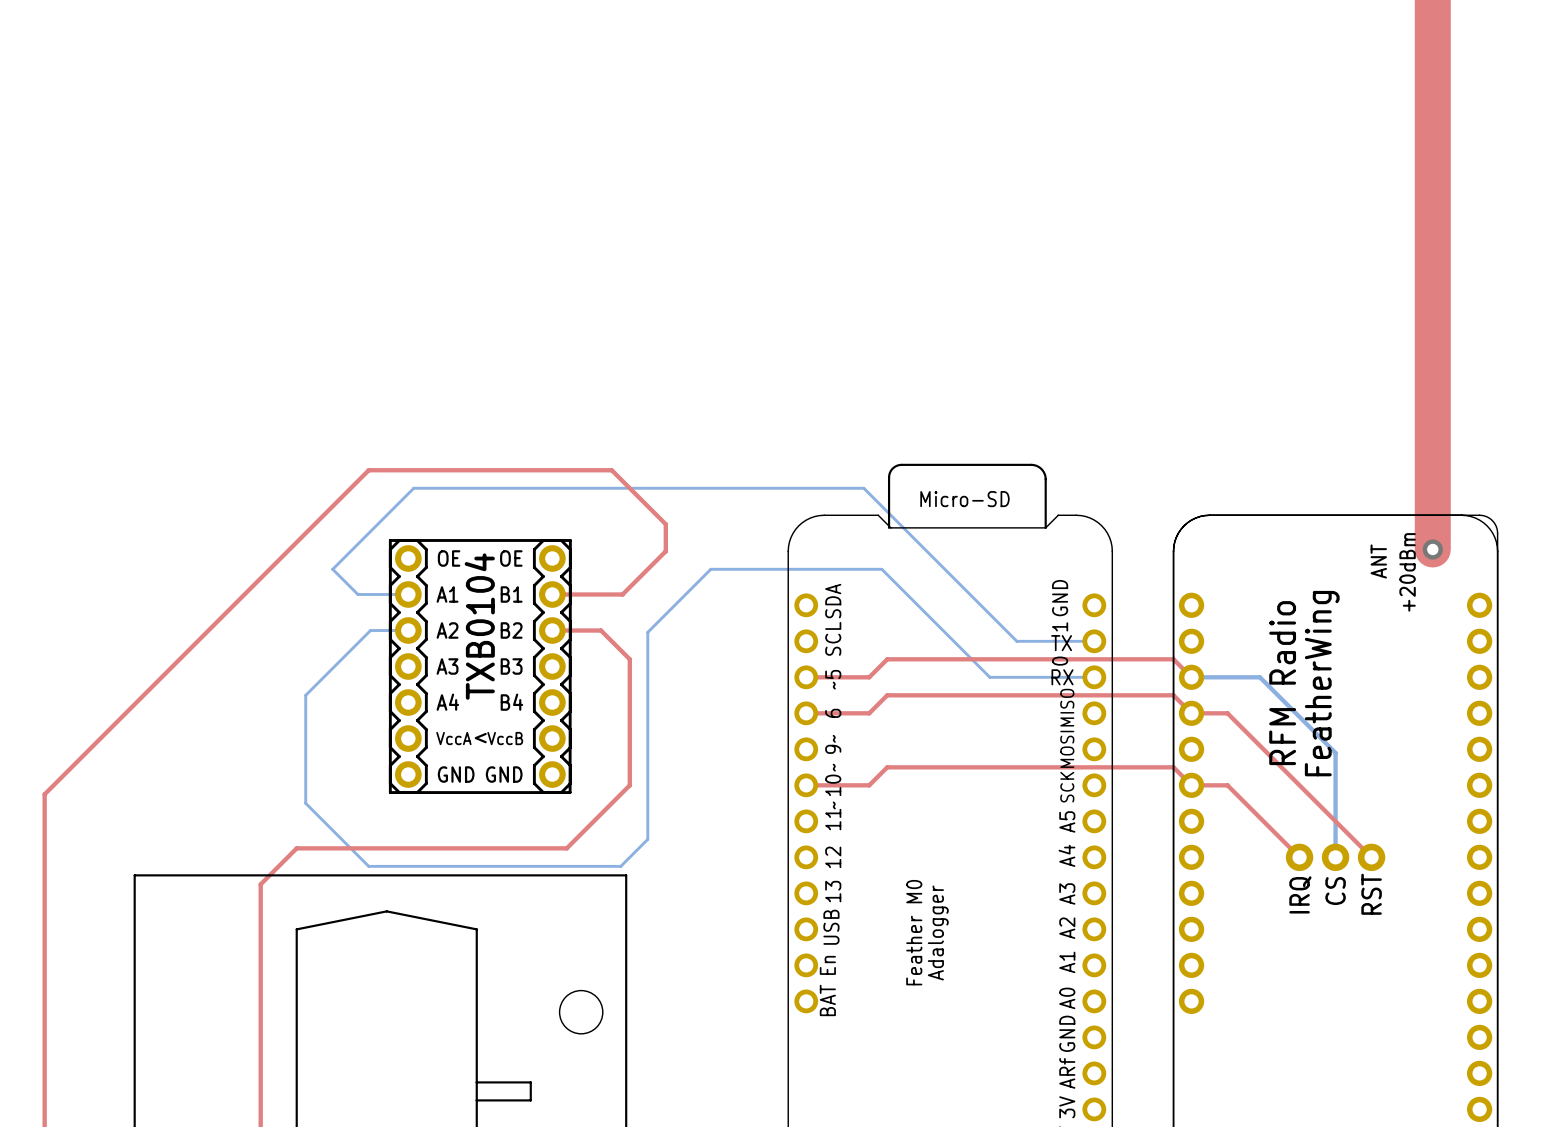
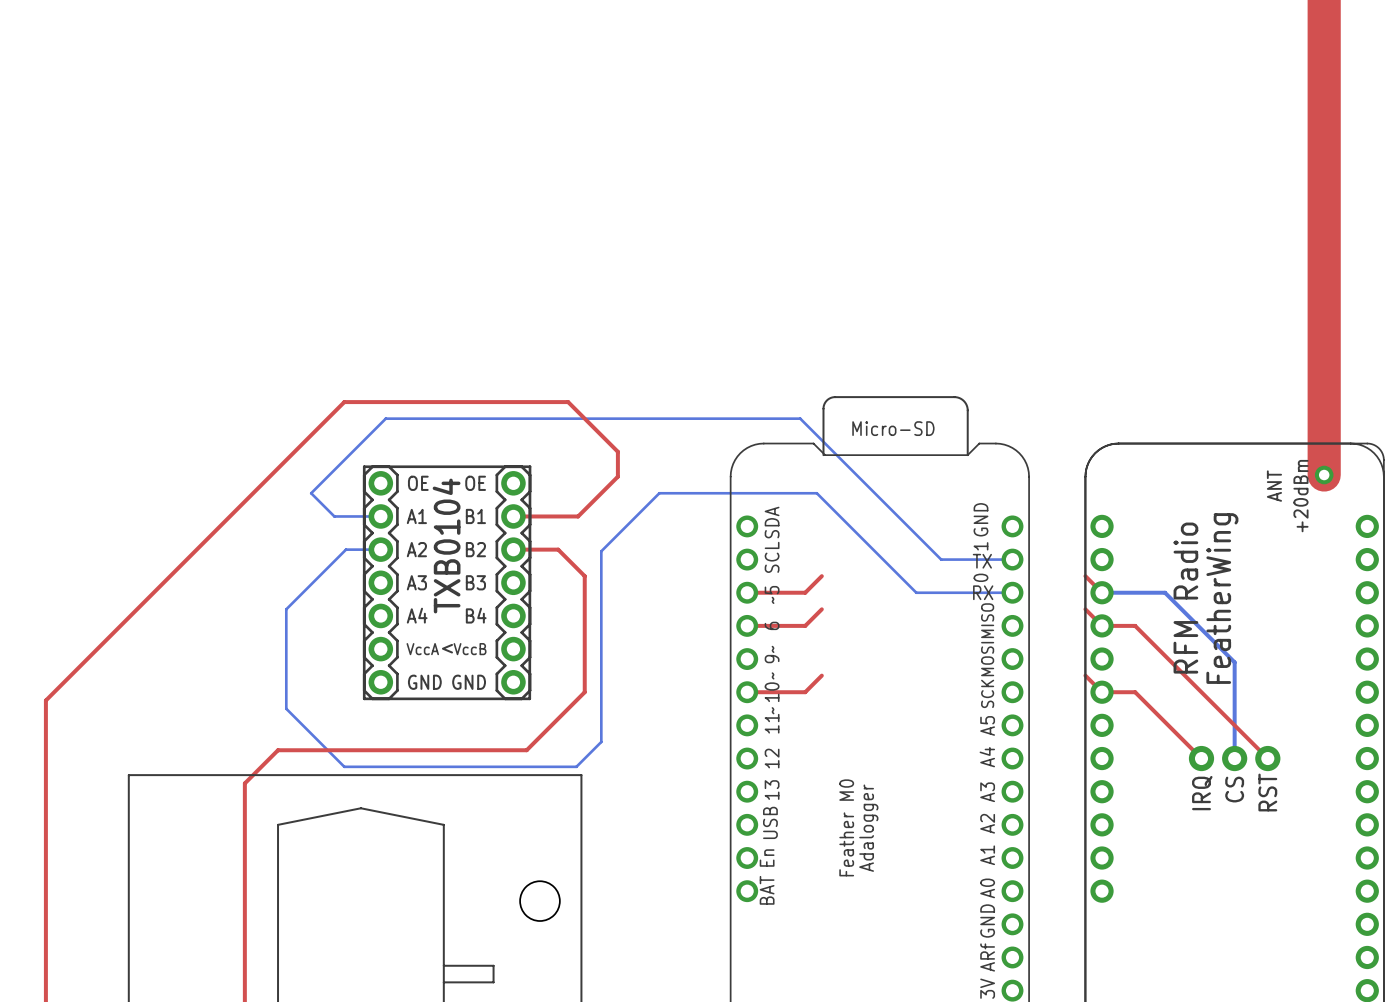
top track: (887, 659) (1173, 659) -> none
top track: (887, 695) (1173, 695) -> none
top track: (887, 767) (1173, 767) -> none

